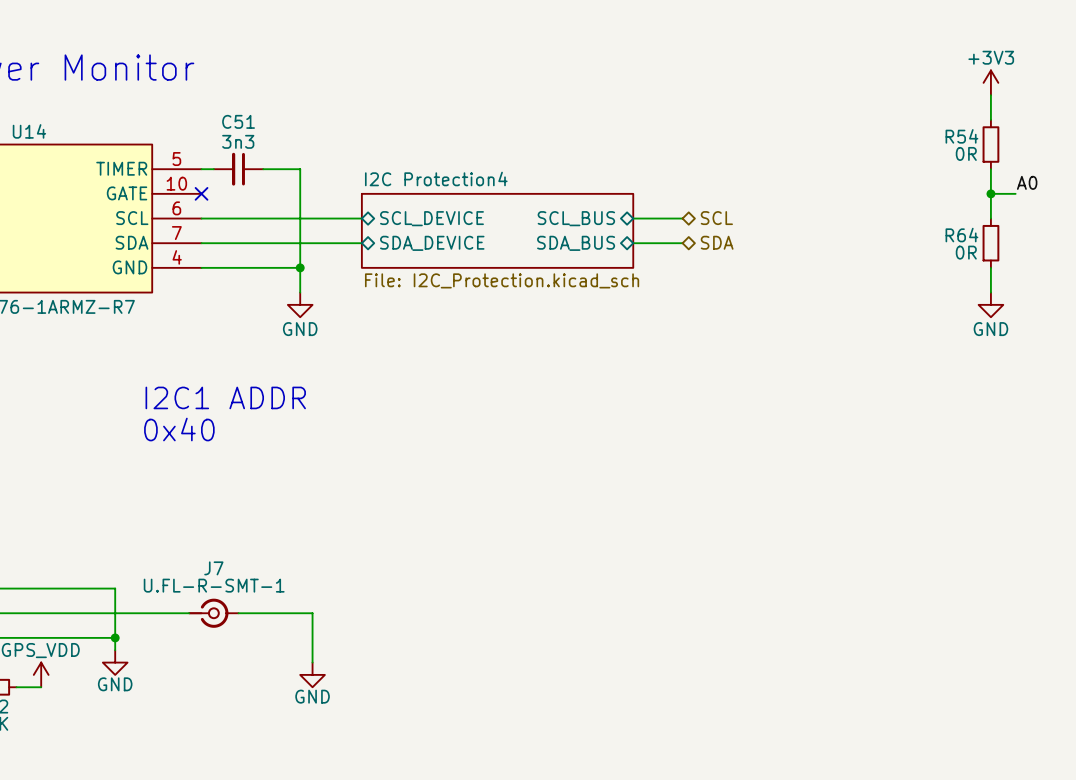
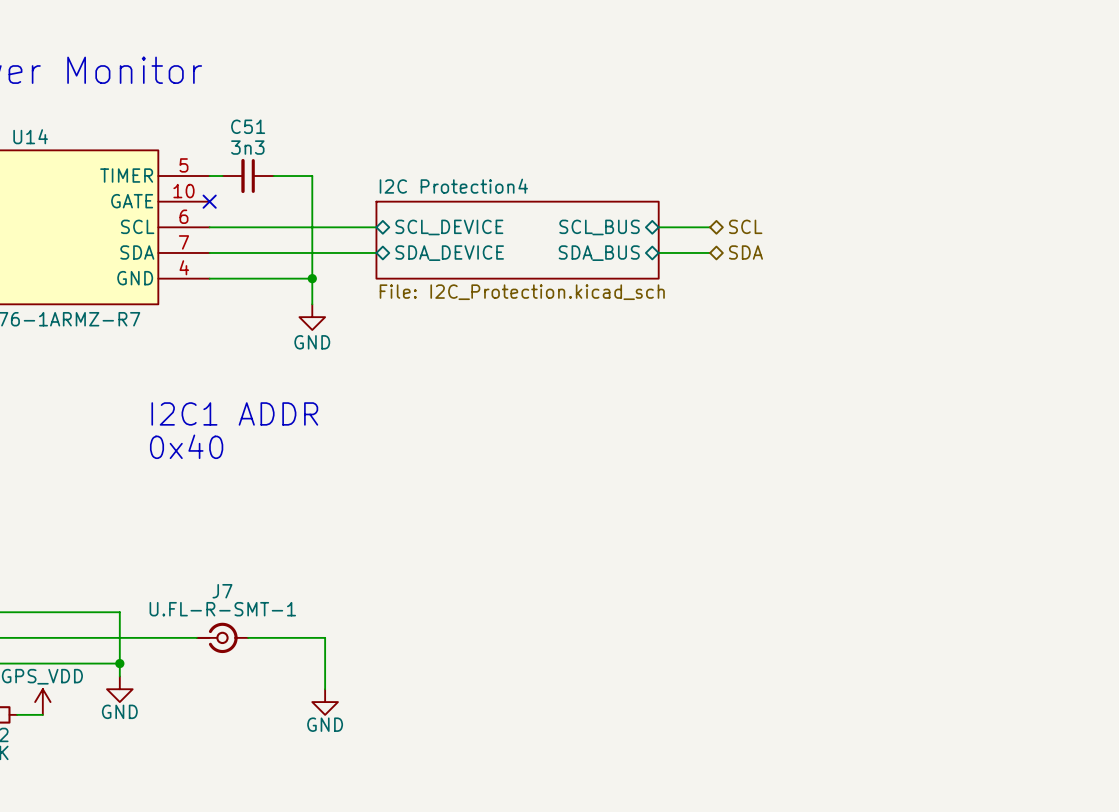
power symbol: +3V3 (990, 82) -> none
wire: (990, 95) (990, 119) -> none
R54: 0R (990, 144) -> none
wire: (990, 169) (990, 218) -> none
label: A0 (1027, 182) -> none
wire: (990, 193) (1015, 193) -> none
junction: (990, 193) -> none
R64: 0R (990, 243) -> none
wire: (990, 267) (990, 292) -> none
power symbol: GND (990, 304) -> none

